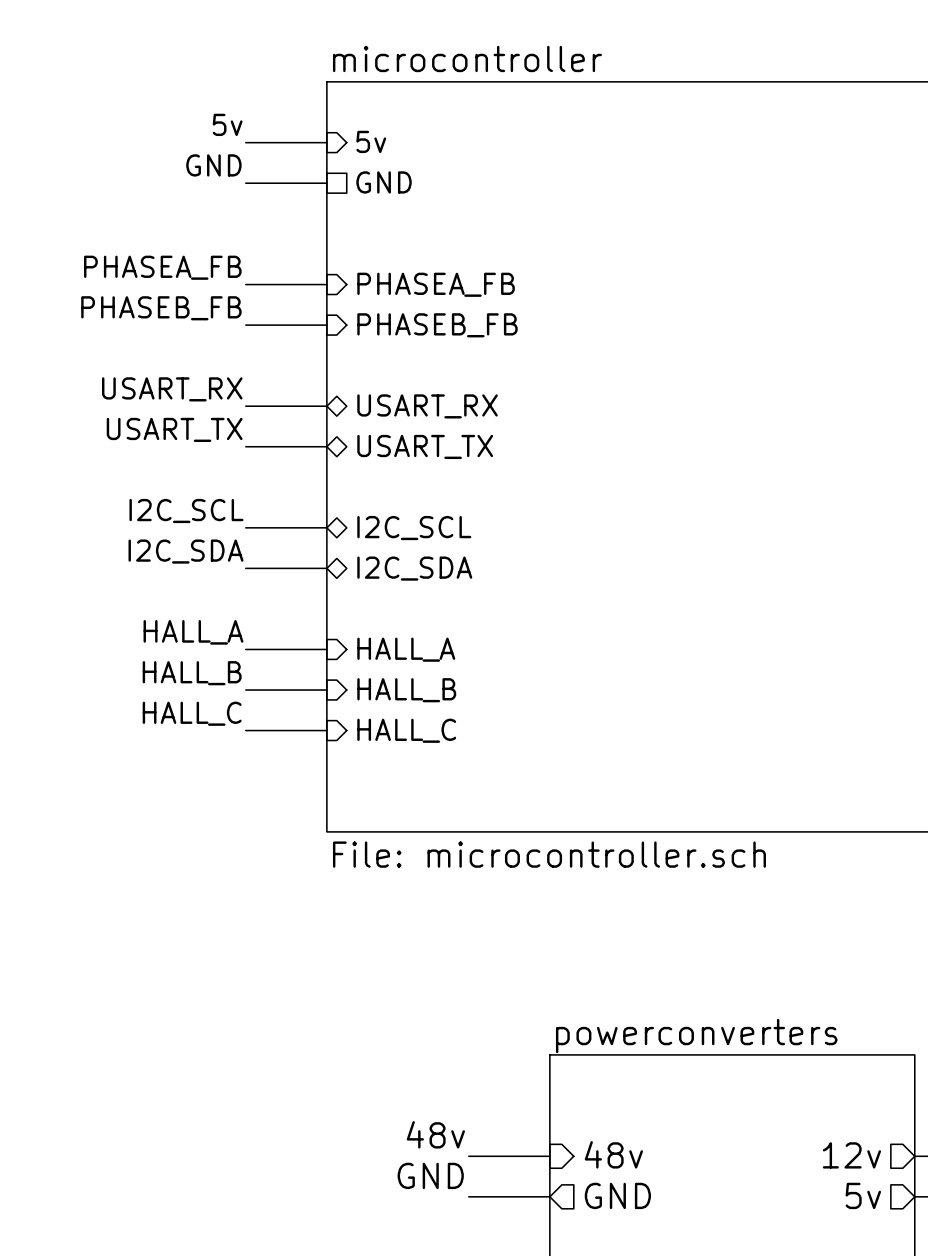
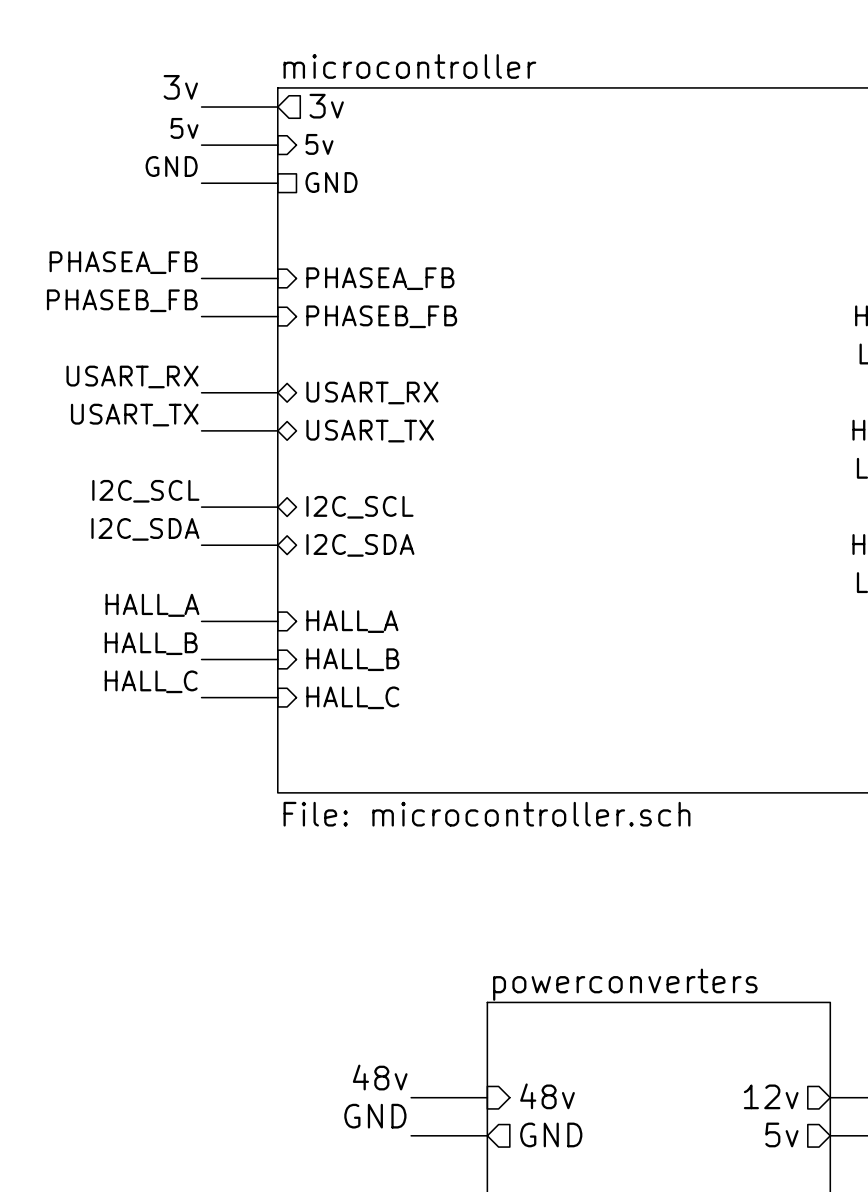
label: none -> 3v (180, 87)
sheet pin: none -> 3v (326, 106)
wire: none -> (201, 107) (277, 107)

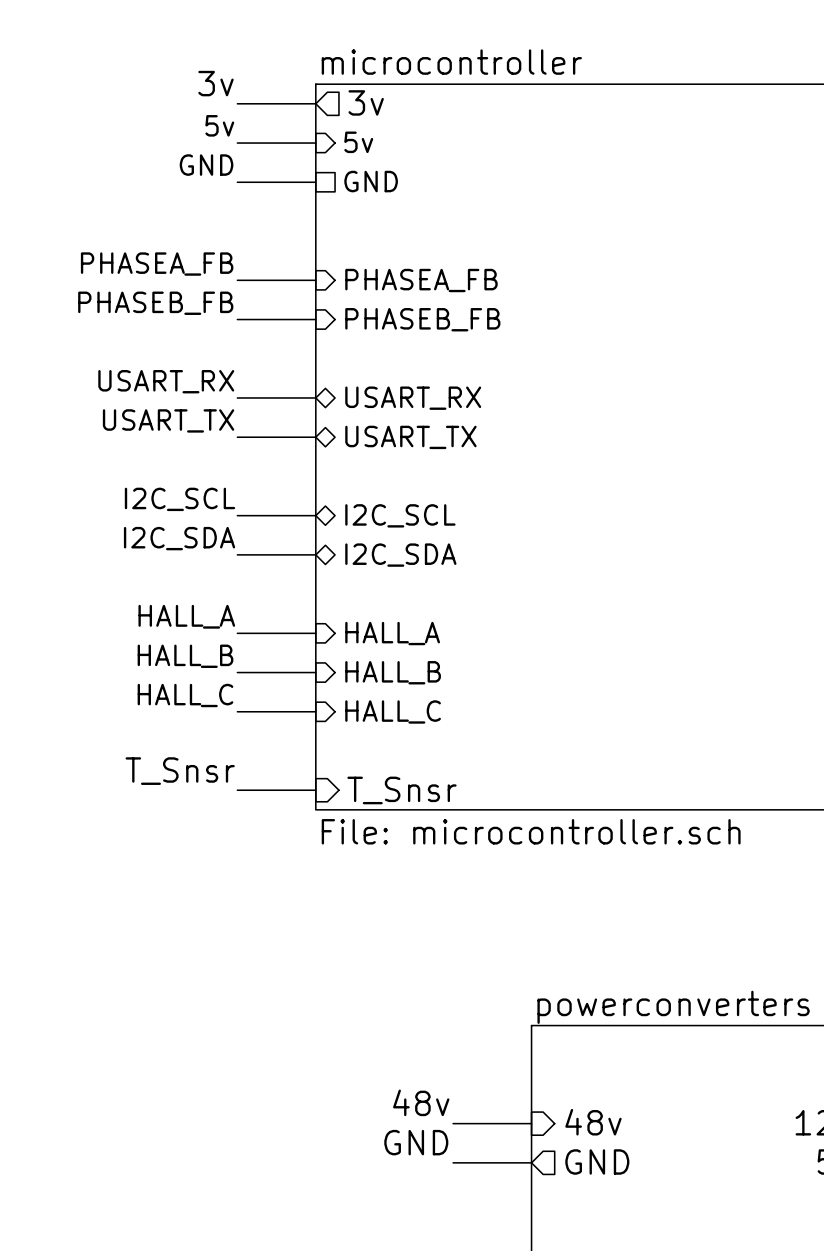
label: none -> T_Snsr (180, 771)
wire: none -> (237, 790) (315, 790)
sheet pin: none -> T_Snsr (401, 790)

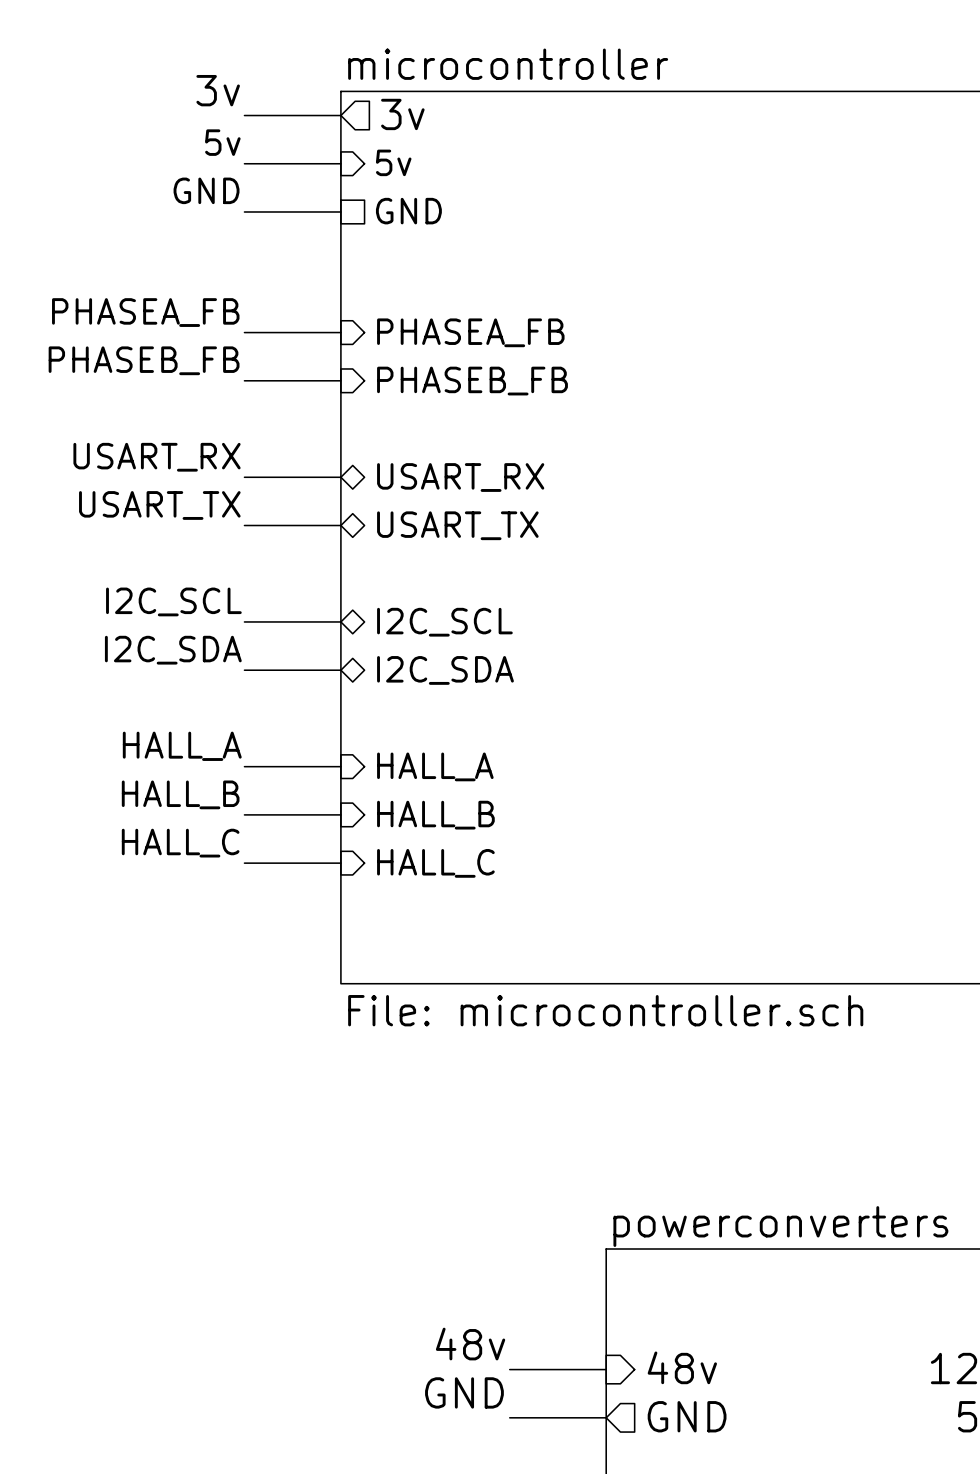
label: T_Snsr (180, 771) -> none
wire: (237, 790) (315, 790) -> none
sheet pin: T_Snsr (401, 790) -> none

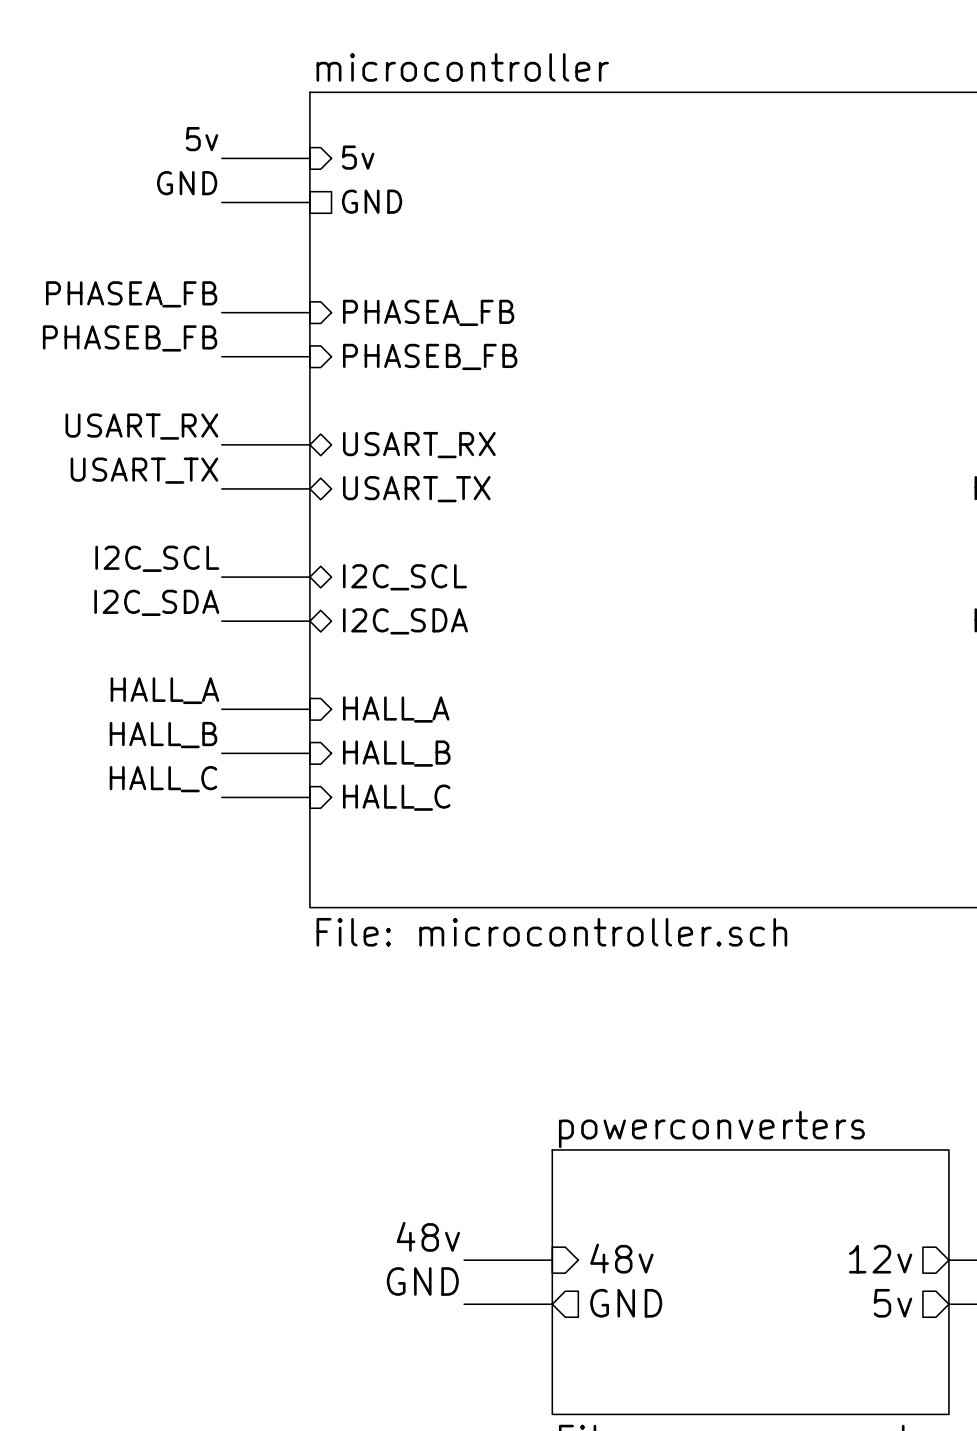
label: 3v (218, 90) -> none
sheet pin: 3v (402, 114) -> none
wire: (244, 115) (340, 115) -> none

